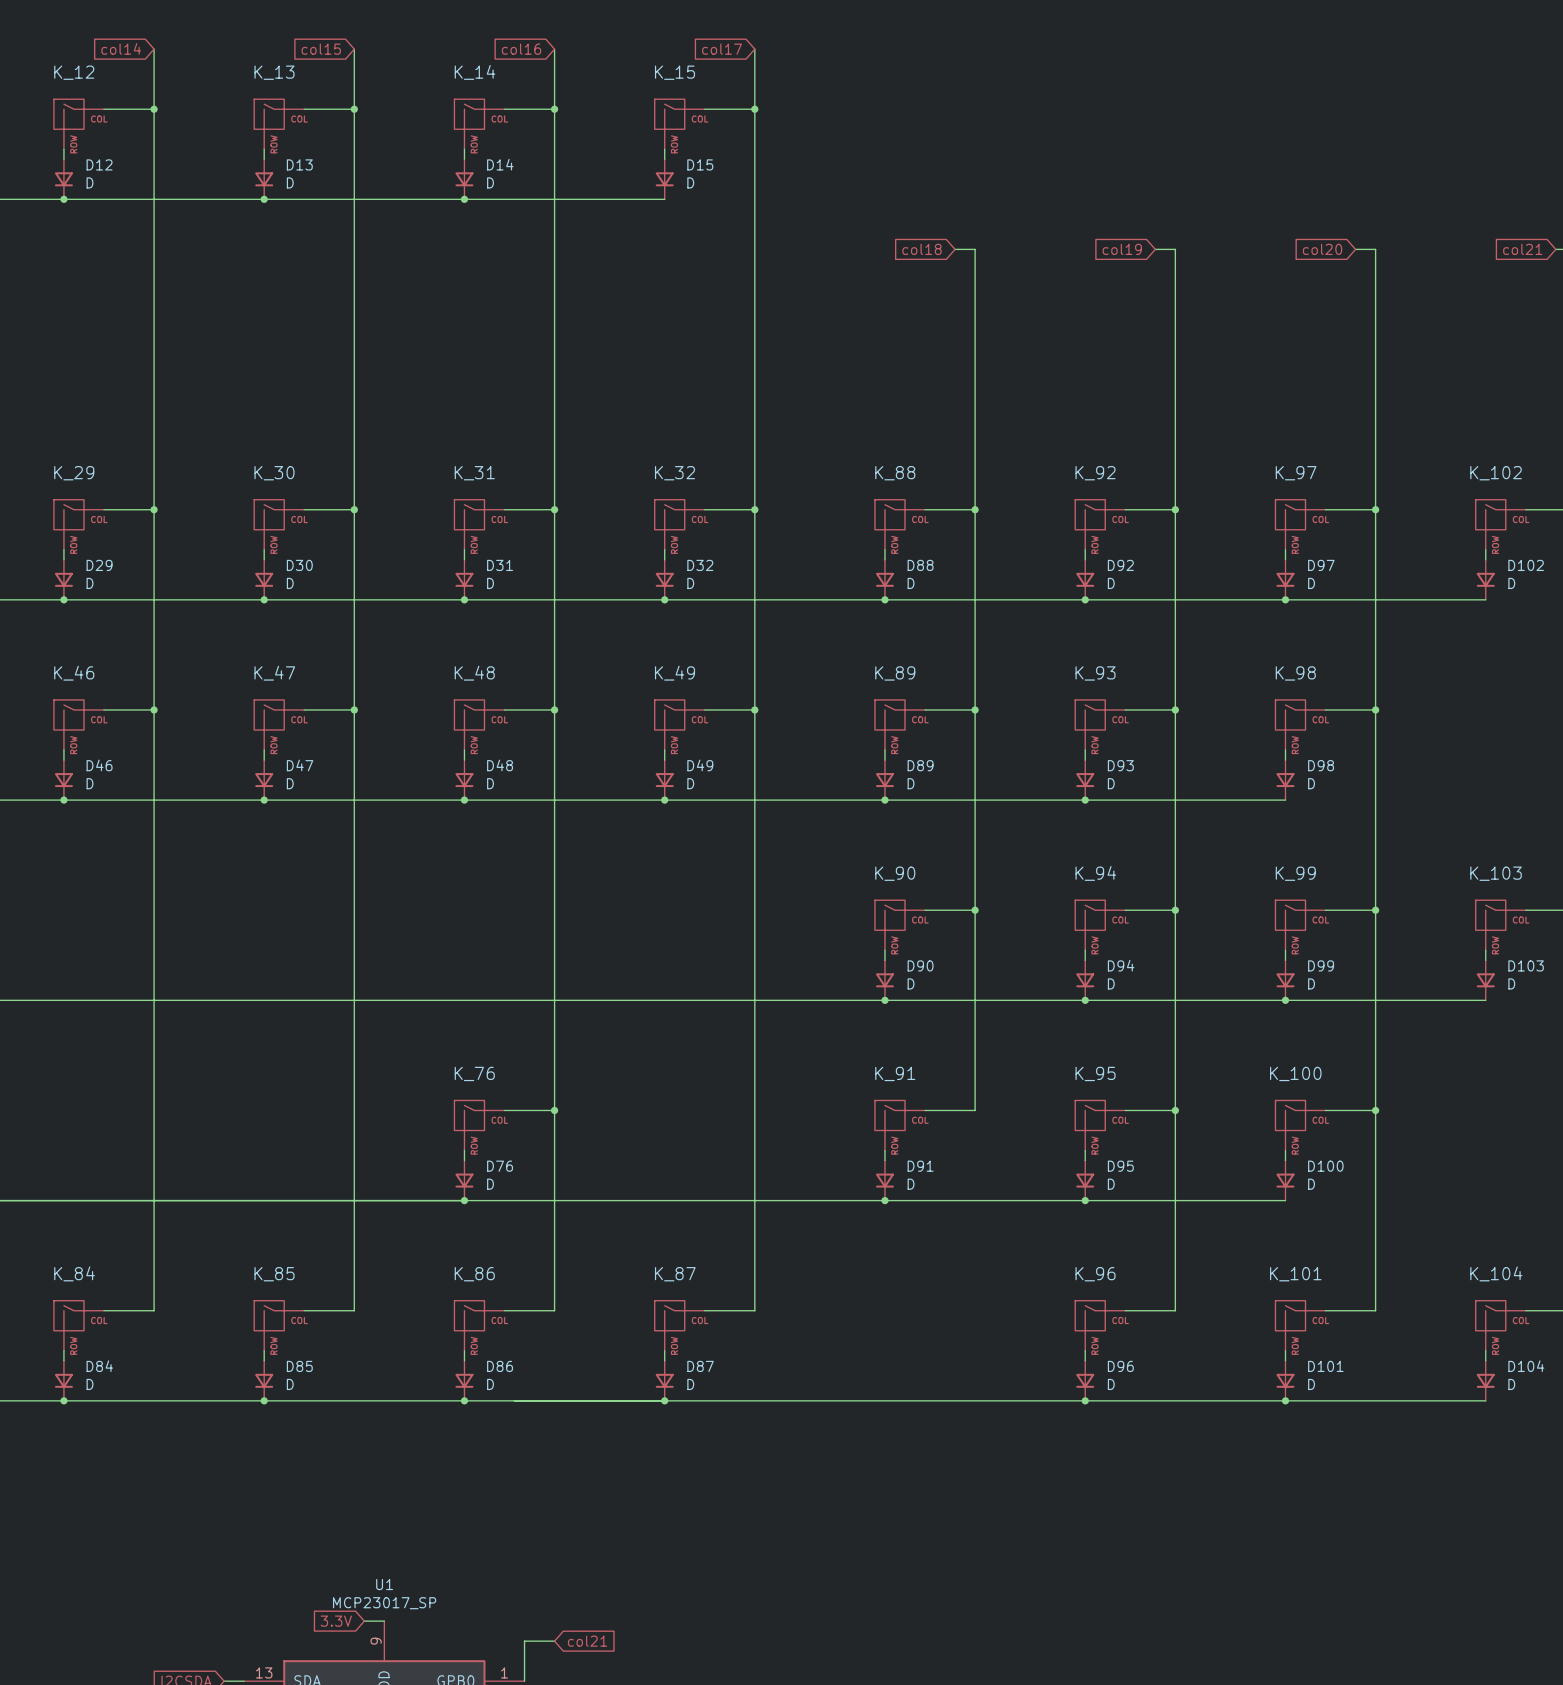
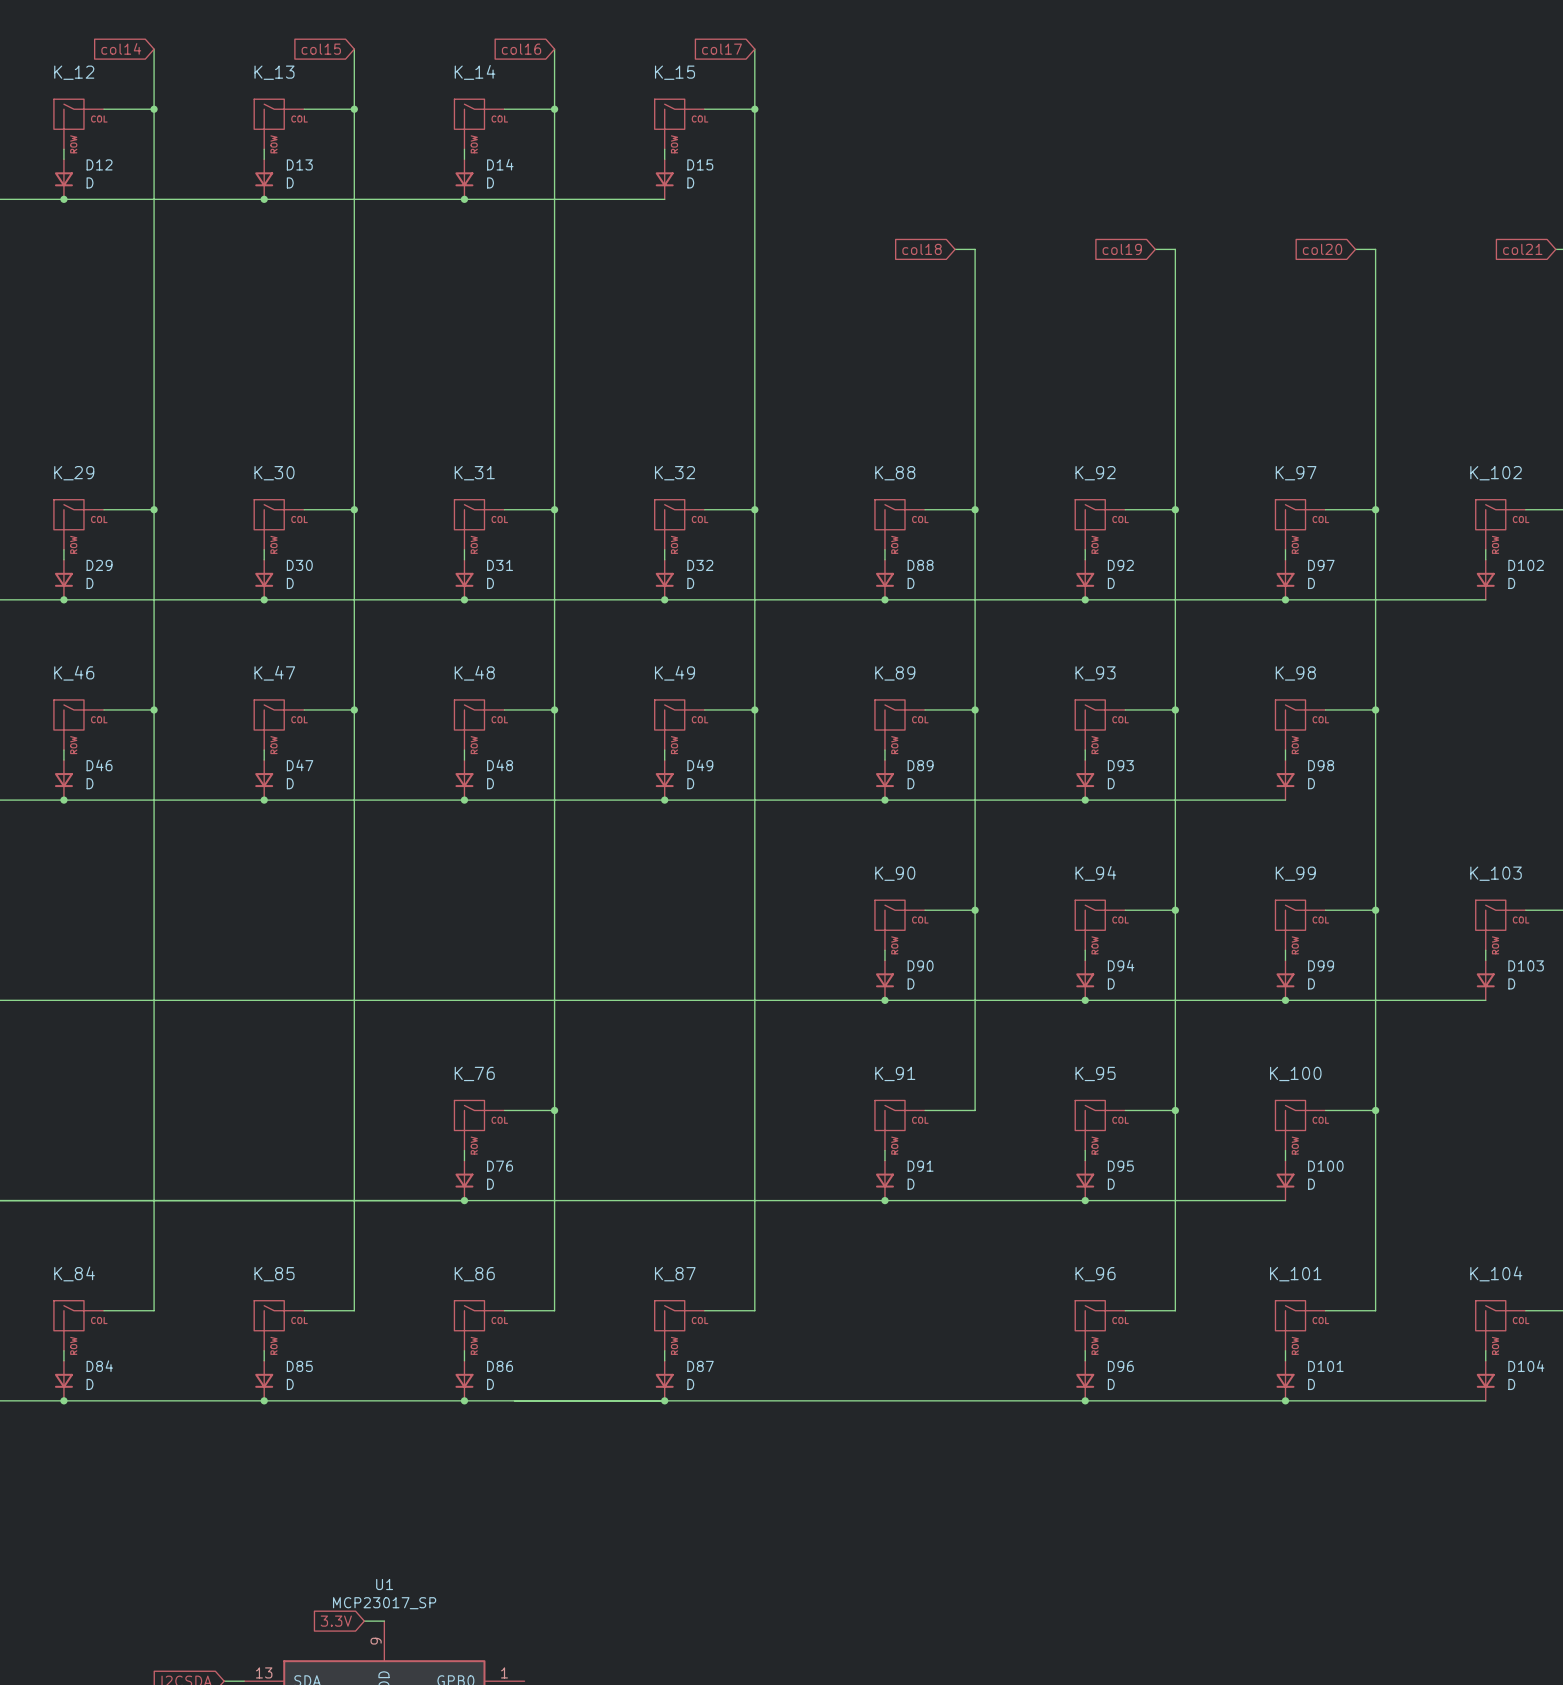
wire: (554, 1641) (524, 1641) (524, 1681) -> none
global label: col21 (587, 1641) -> none

